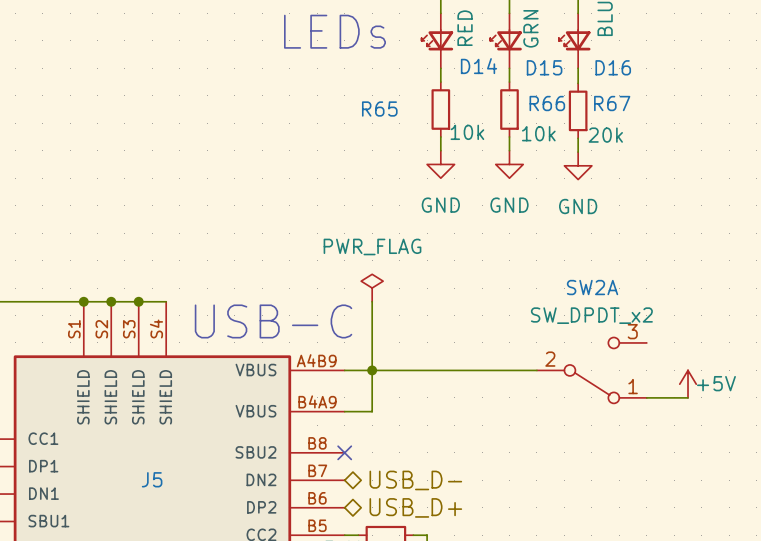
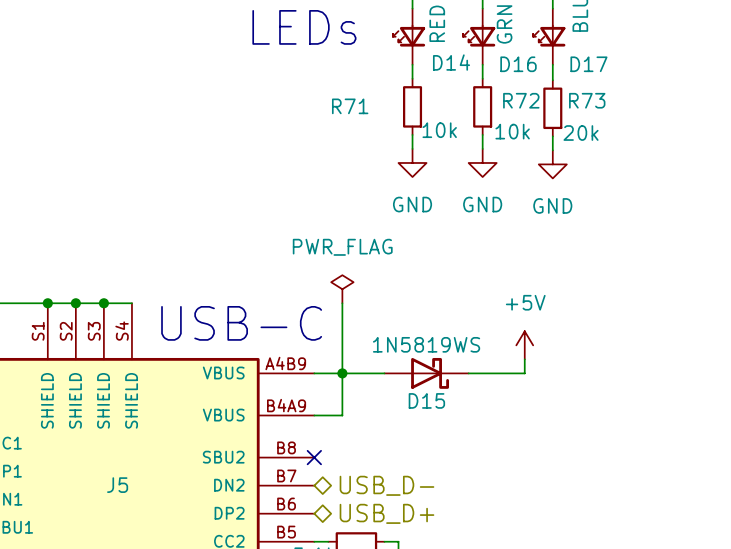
D15 name: D15 (544, 67) -> D16 (518, 64)
D16 name: D16 (613, 67) -> D17 (588, 64)
R66 name: R66 (547, 103) -> R72 (521, 100)
R67 name: R67 (612, 103) -> R73 (587, 100)
R65 name: R65 (379, 109) -> R71 (350, 106)
D15: none -> 1N5819WS (426, 373)
SW2A: SW_DPDT_x2 (591, 370) -> none
power symbol text position: +5V (716, 383) -> +5V (525, 302)
power symbol position: +5V (688, 384) -> +5V (524, 345)
wire: (646, 397) (688, 397) -> none

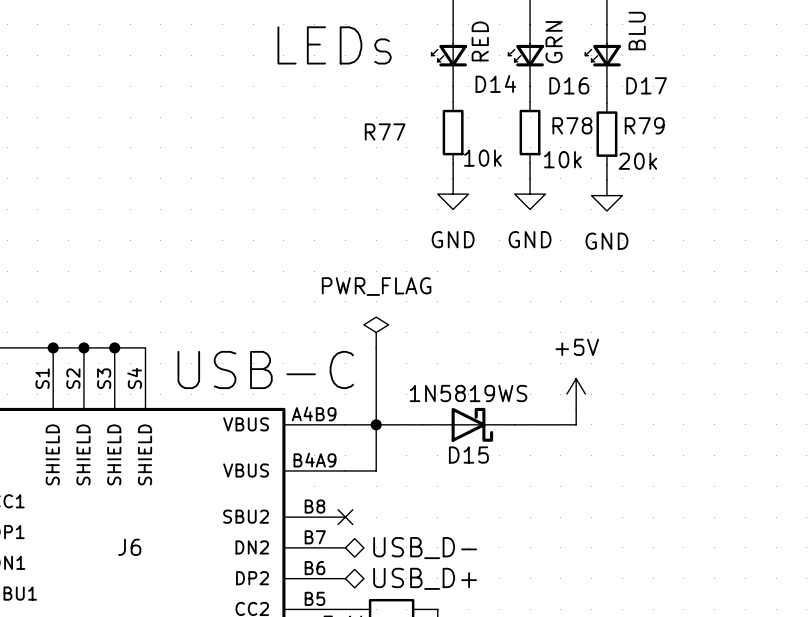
R72 name: R72 (521, 100) -> R78 (572, 125)
R73 name: R73 (587, 100) -> R79 (644, 125)
R71 name: R71 (350, 106) -> R77 (385, 131)
J5 name: J5 (117, 485) -> J6 (129, 547)

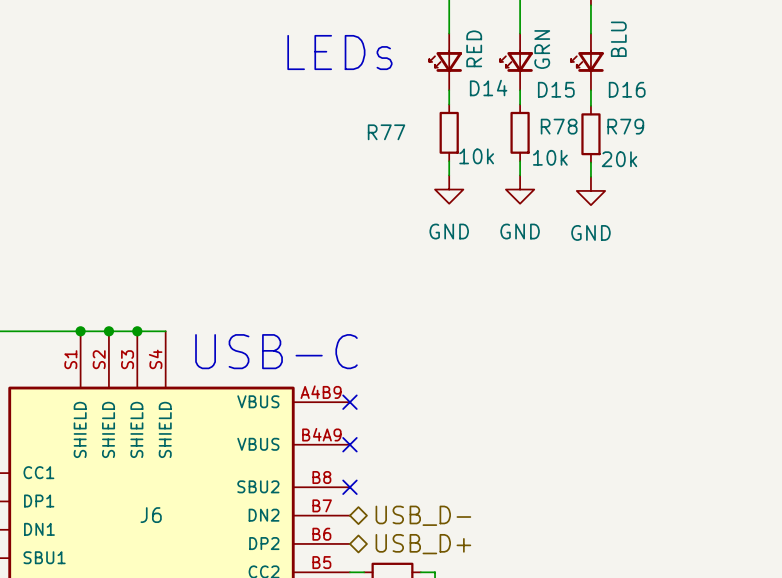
D16 name: D16 (569, 85) -> D15 (556, 89)
D17 name: D17 (646, 85) -> D16 (627, 89)
power symbol: PWR_FLAG (376, 332) -> none
wire: (376, 347) (376, 470) (345, 470) -> none
power symbol: +5V (576, 394) -> none
wire: (576, 409) (576, 424) (514, 424) -> none
wire: (345, 424) (422, 424) -> none
no-connect mark: none -> (349, 402)
junction: (376, 424) -> none
D15: 1N5819WS (468, 424) -> none
no-connect mark: none -> (349, 444)

